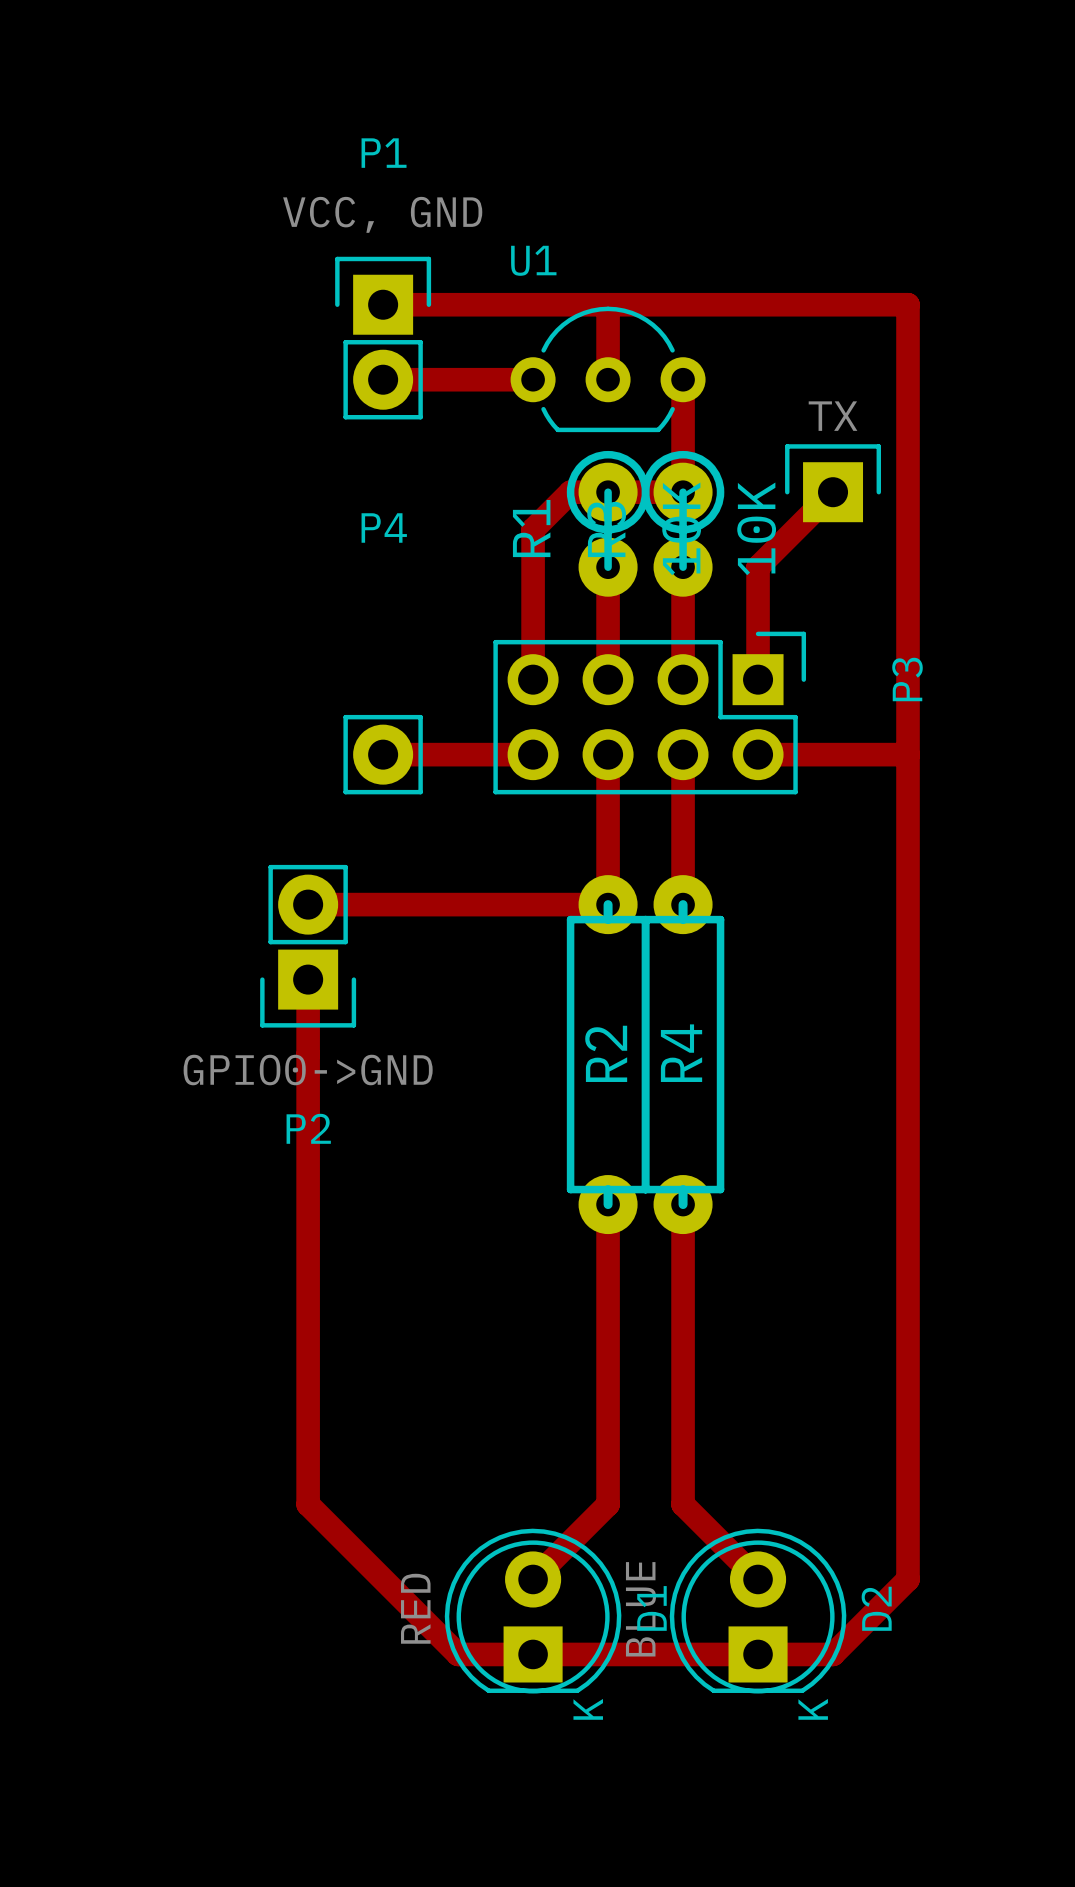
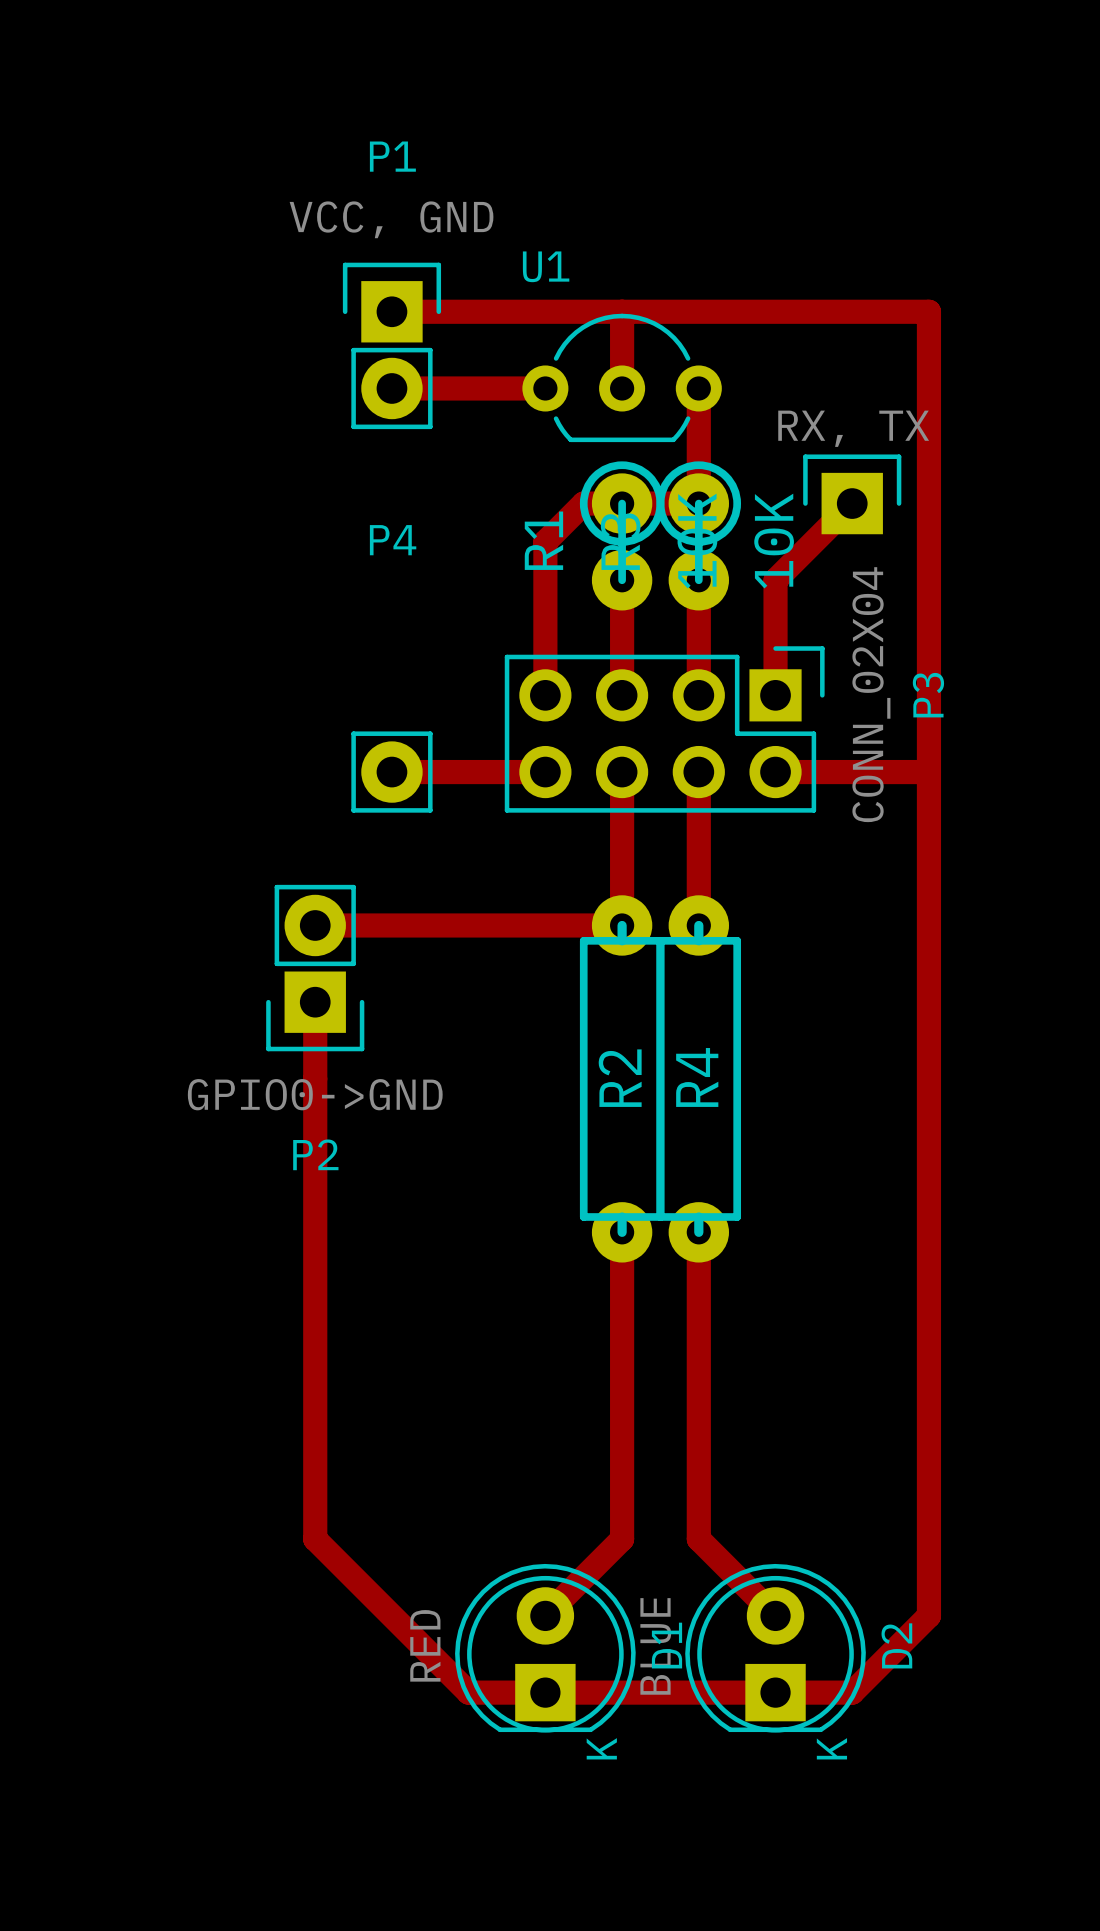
P4 value: TX (833, 416) -> RX, TX (853, 428)
P3 value: none -> CONN_02X04 (871, 694)

